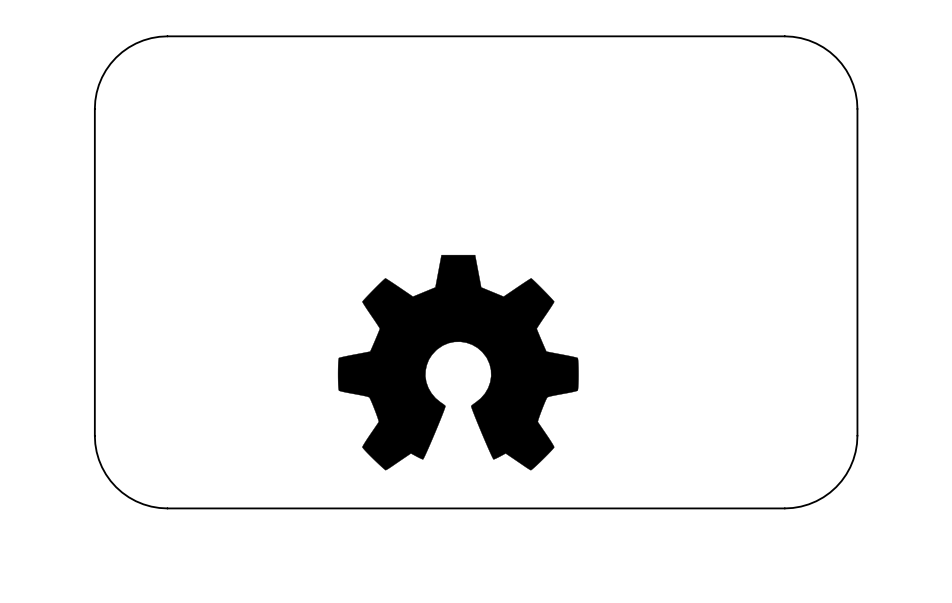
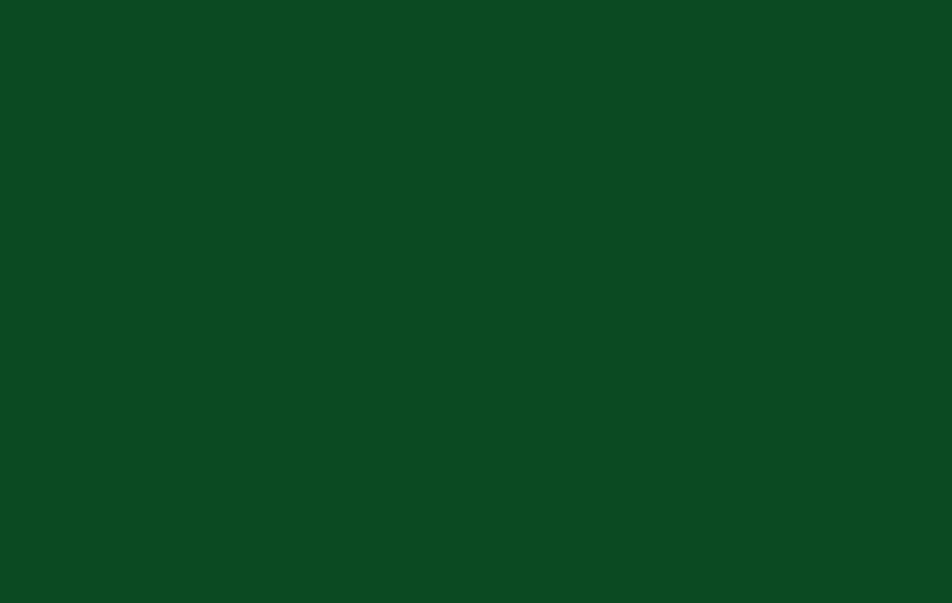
board edge: (167, 36) (784, 36) (800, 38) (823, 47) (836, 57) (846, 70) (853, 84) (857, 108) (857, 435) (853, 459) (846, 474) (836, 487) (816, 501) (800, 506) (784, 508) (167, 508) (143, 504) (128, 497) (116, 487) (105, 474) (98, 459) (95, 443) (95, 100) (102, 77) (116, 57) (135, 43) (151, 38) (167, 36) -> none
drawing: [337, 254, 579, 471] -> none

